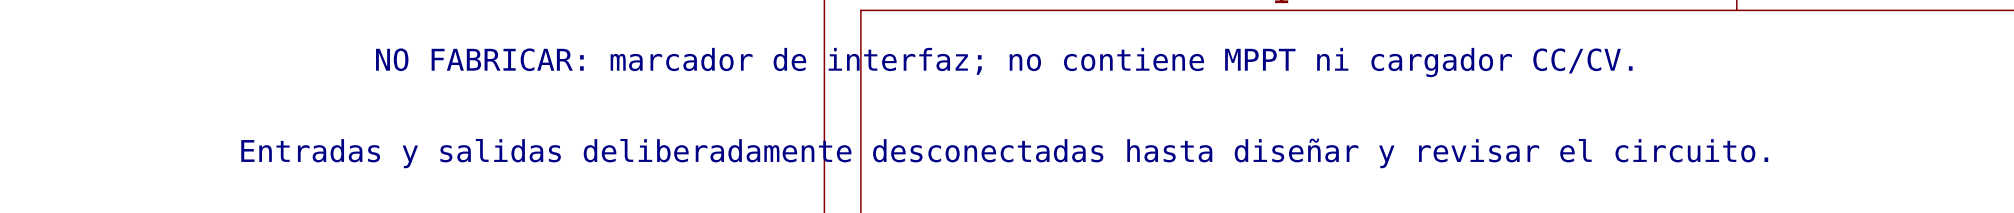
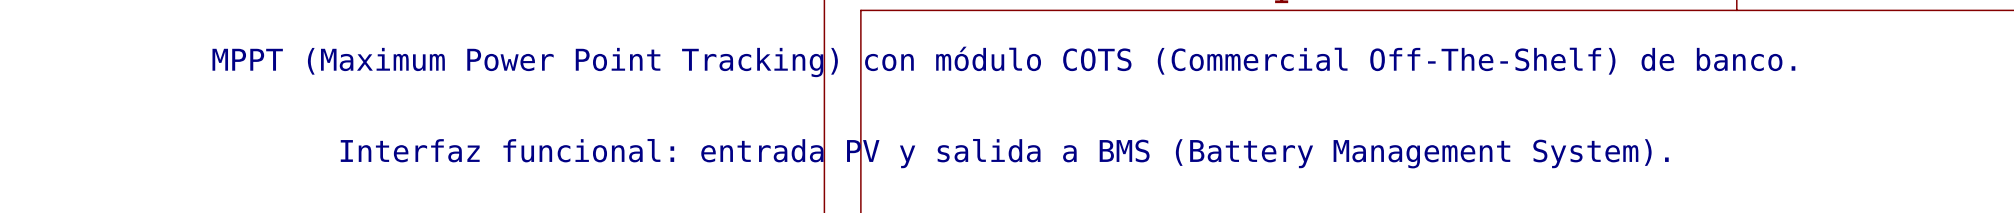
text: NO FABRICAR: marcador de interfaz; no contiene MPPT ni cargador CC/CV. (1004, 62) -> MPPT (Maximum Power Point Tracking) con módulo COTS (Commercial Off-The-Shelf) de banco. (1003, 61)
text: Entradas y salidas deliberadamente desconectadas hasta diseñar y revisar el circuito. (1004, 153) -> Interfaz funcional: entrada PV y salida a BMS (Battery Management System). (1004, 153)

